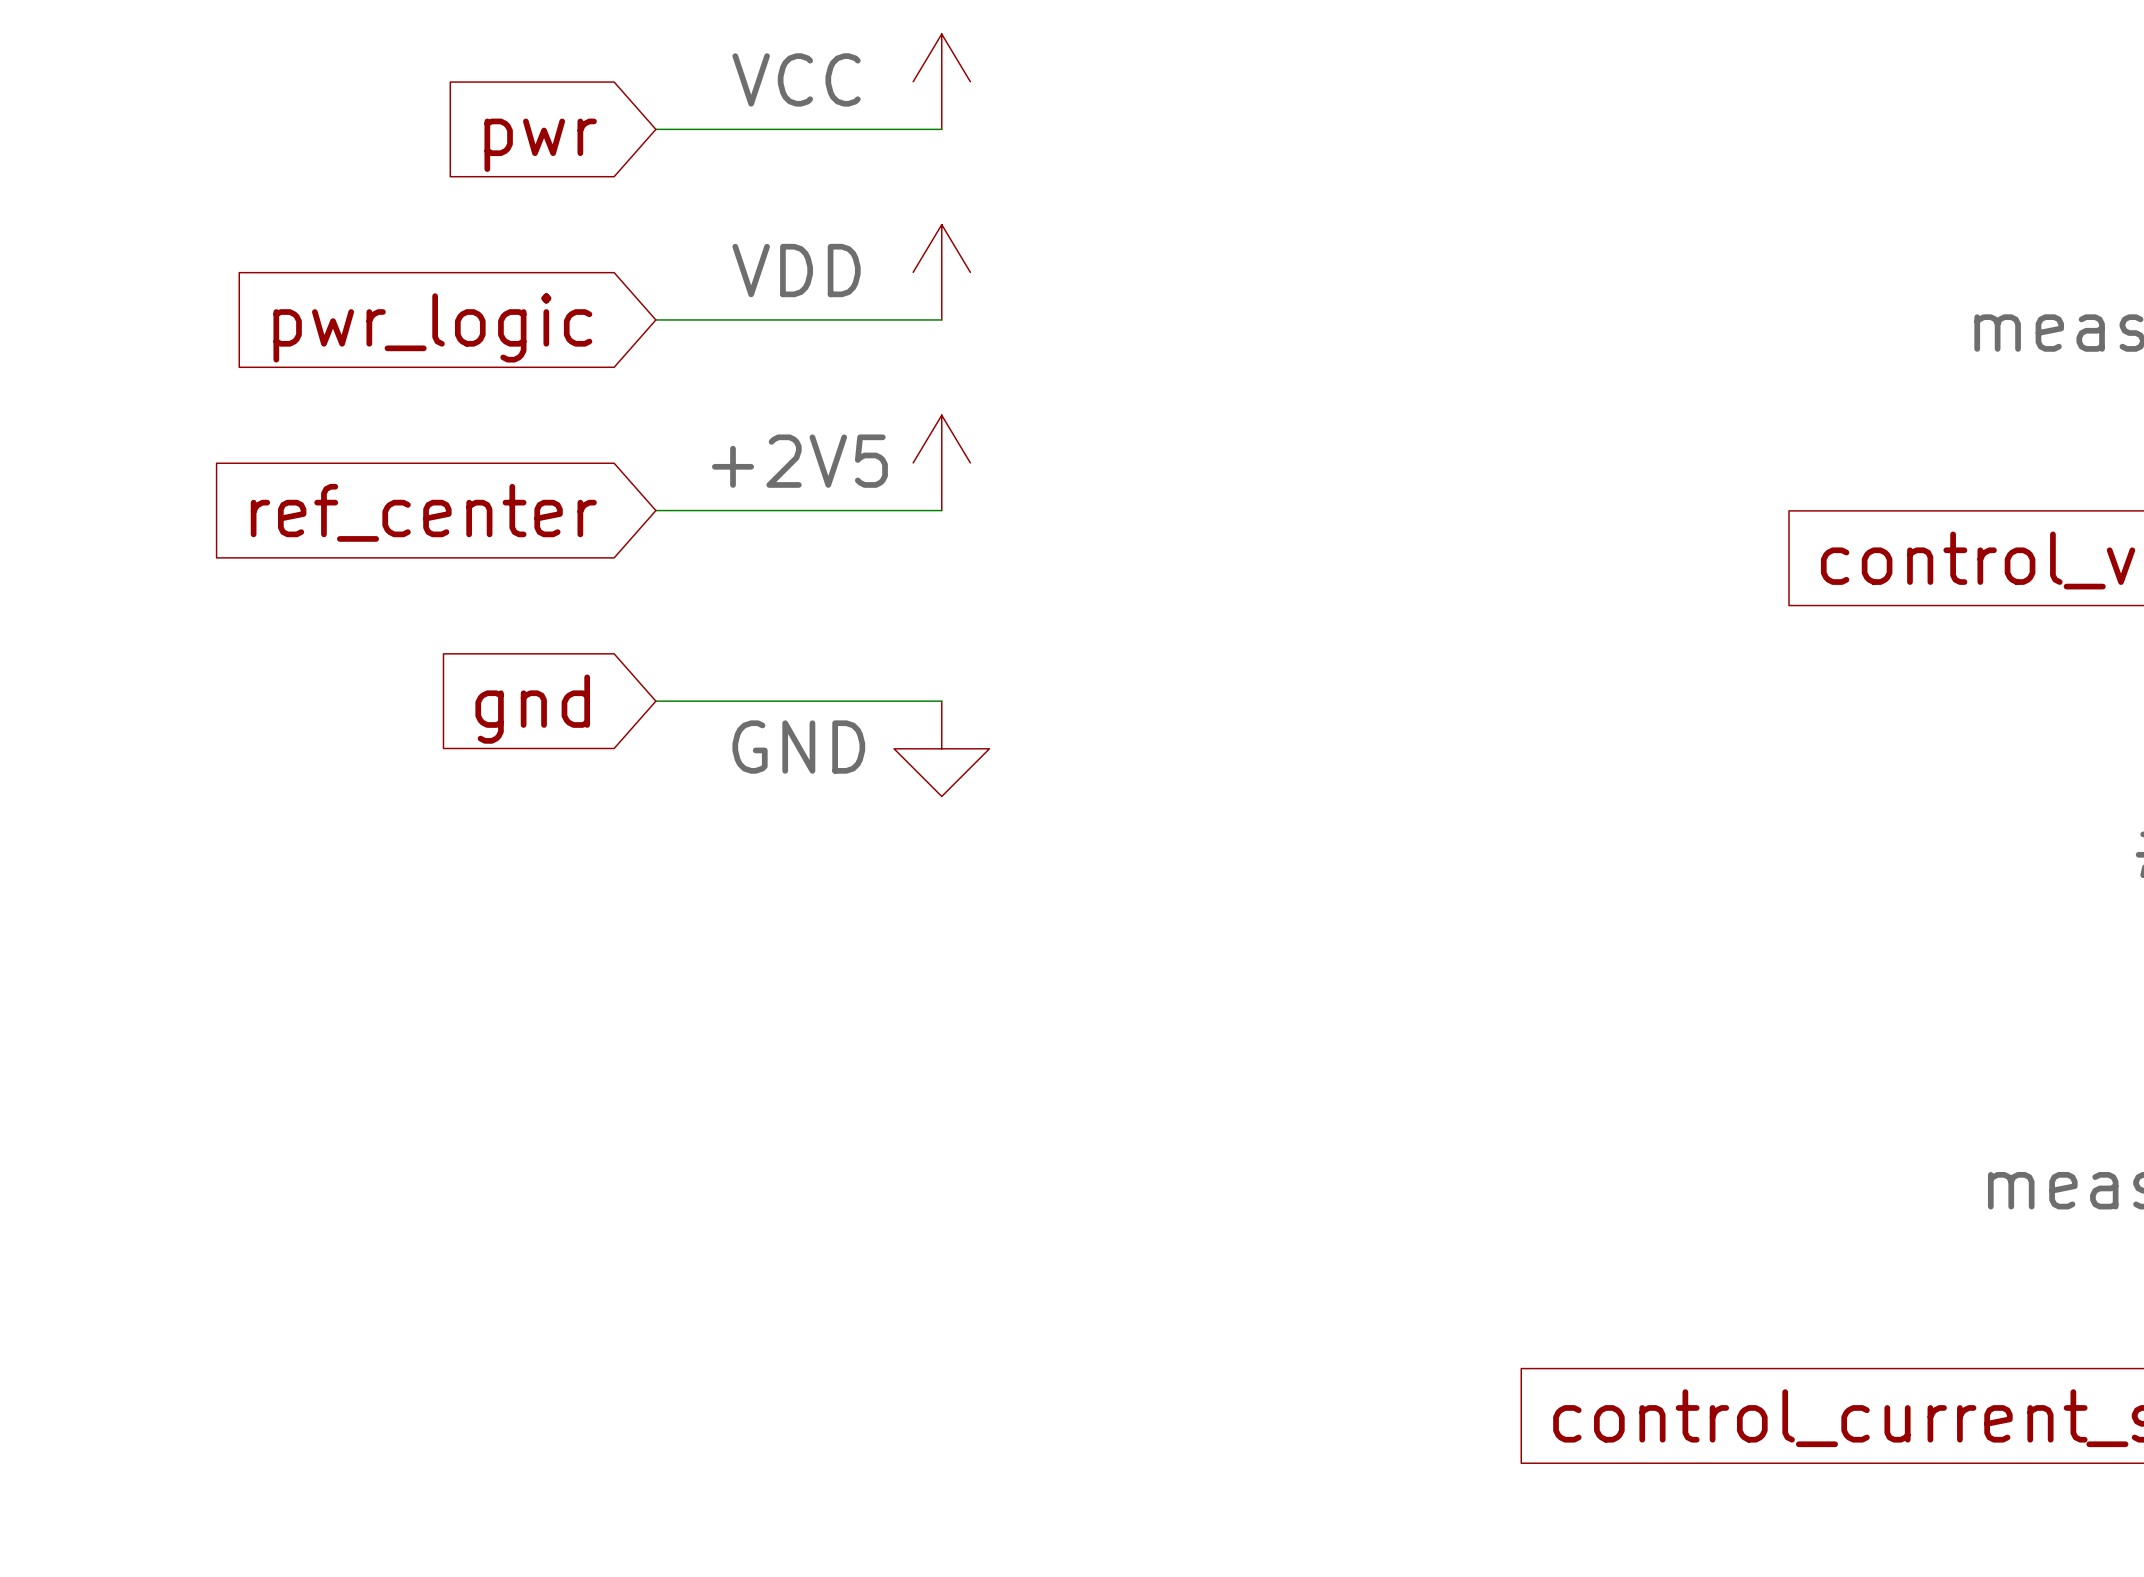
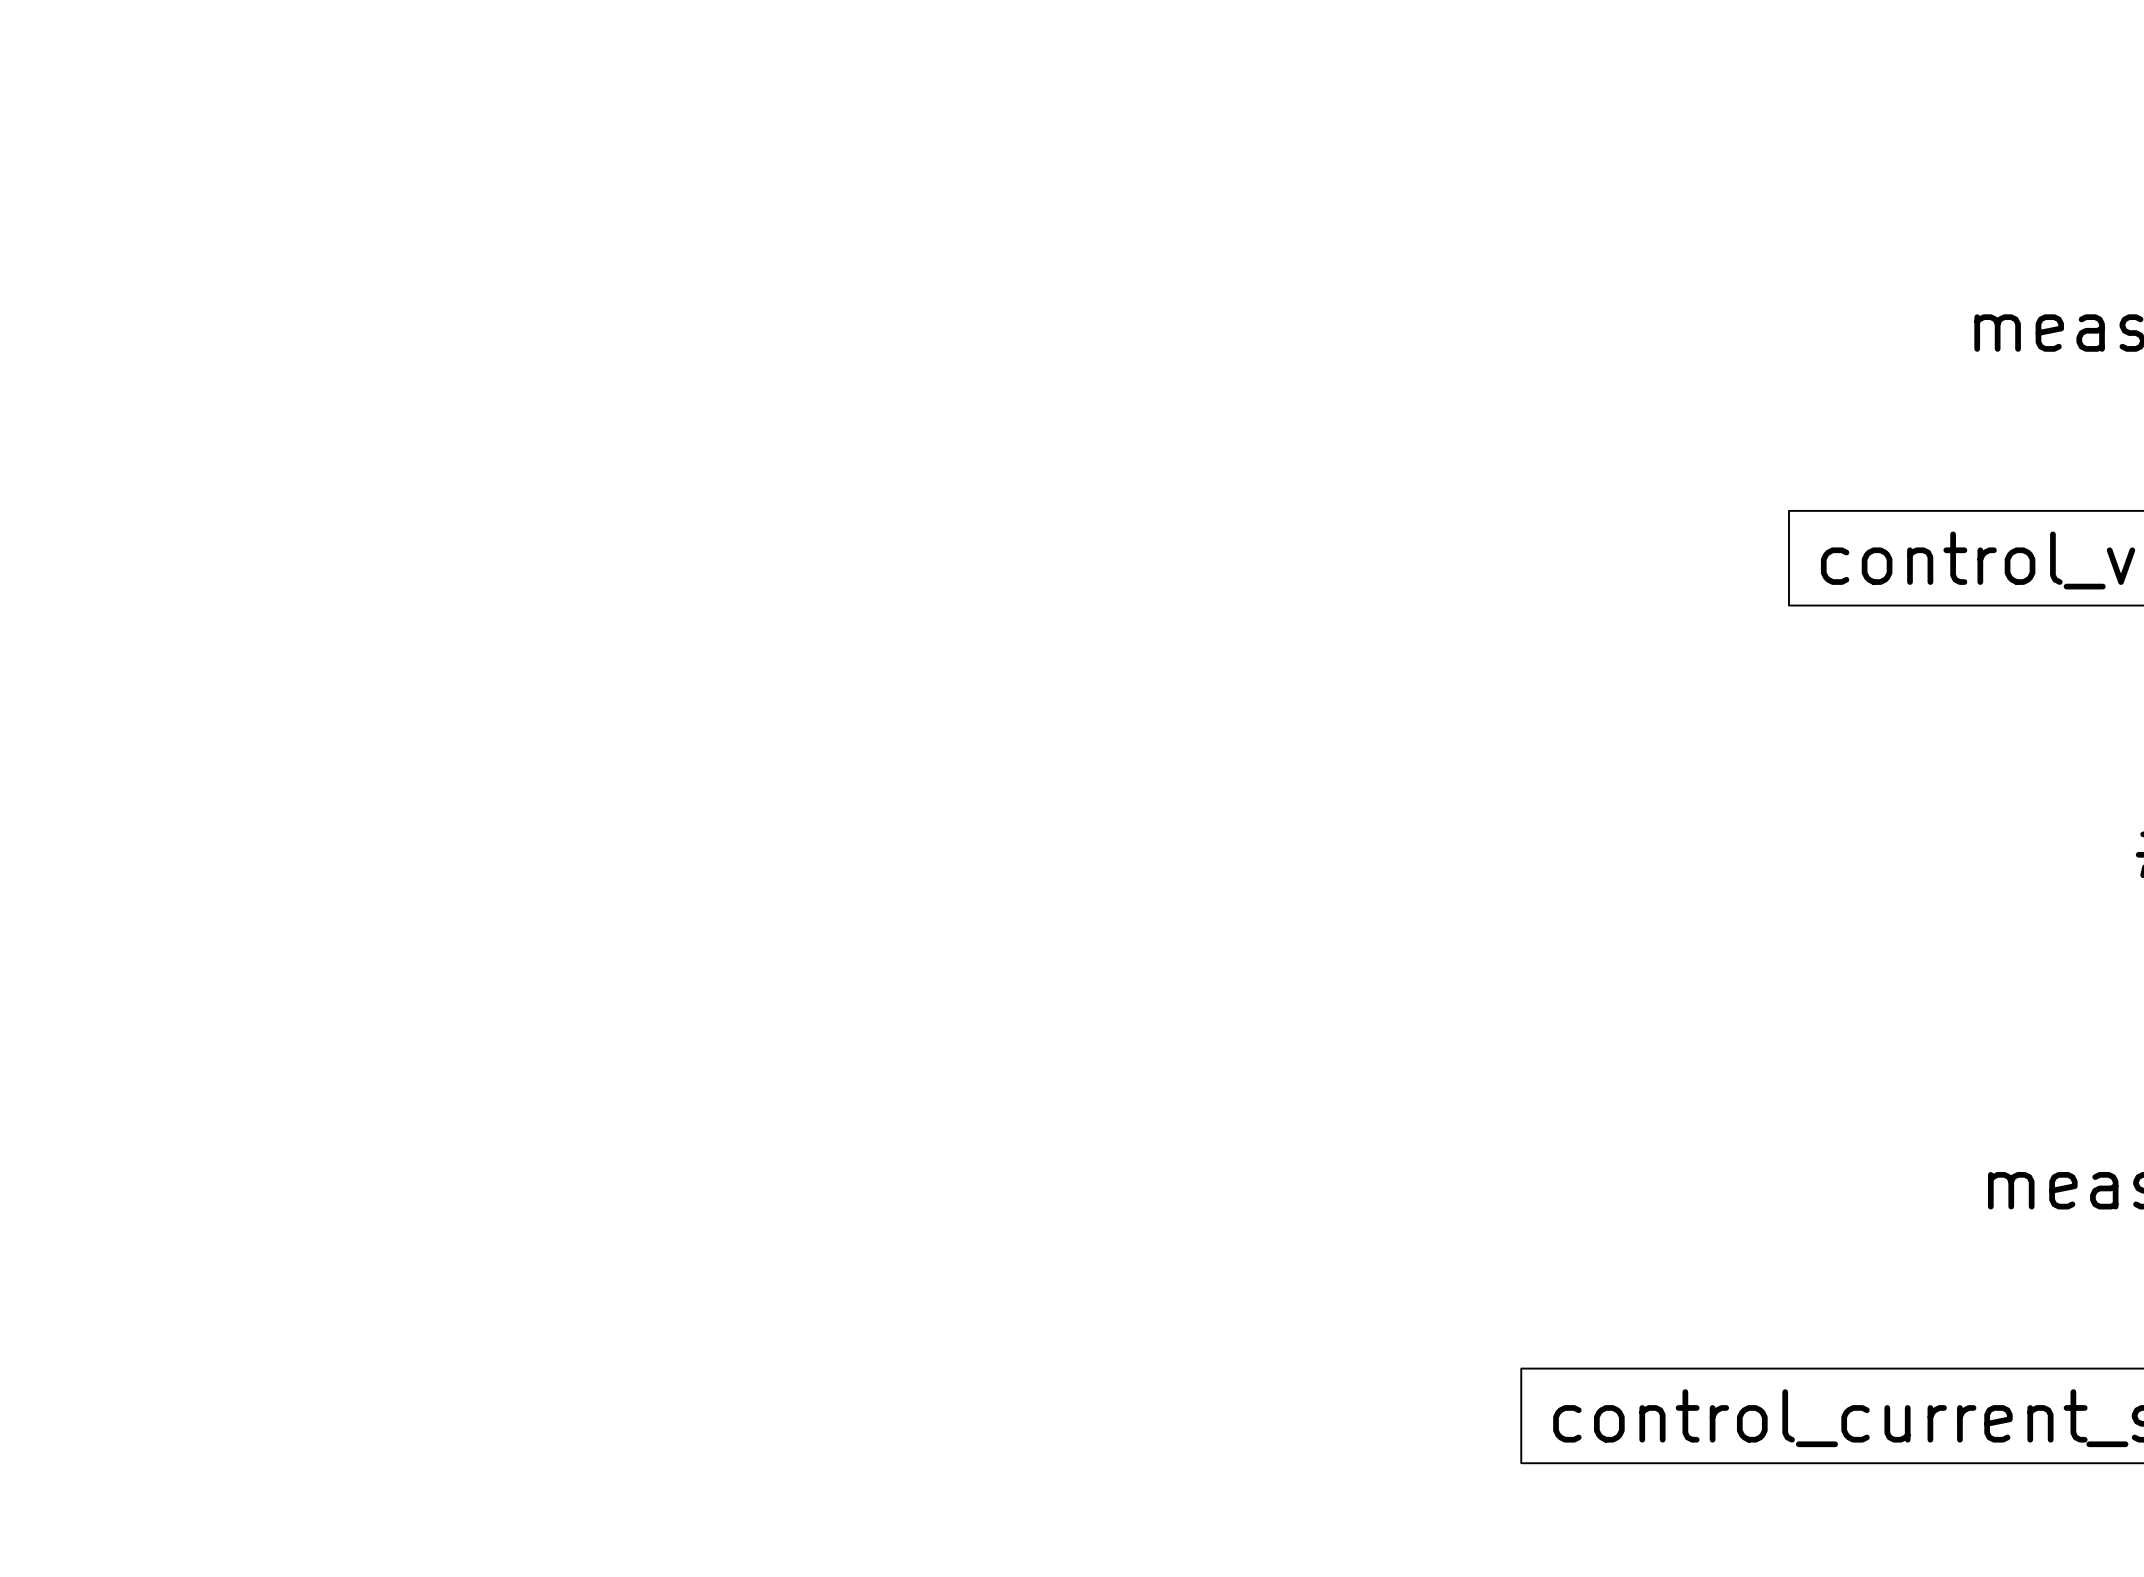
power symbol: VCC (941, 81) -> none
wire: (655, 129) (941, 129) -> none
global label: pwr (540, 145) -> none
power symbol: VDD (941, 272) -> none
wire: (655, 319) (941, 319) -> none
global label: pwr_logic (432, 327) -> none
power symbol: +2V5 (941, 462) -> none
wire: (655, 510) (941, 510) -> none
global label: ref_center (423, 512) -> none
wire: (655, 701) (941, 701) -> none
global label: gnd (532, 709) -> none
power symbol: GND (941, 748) -> none

